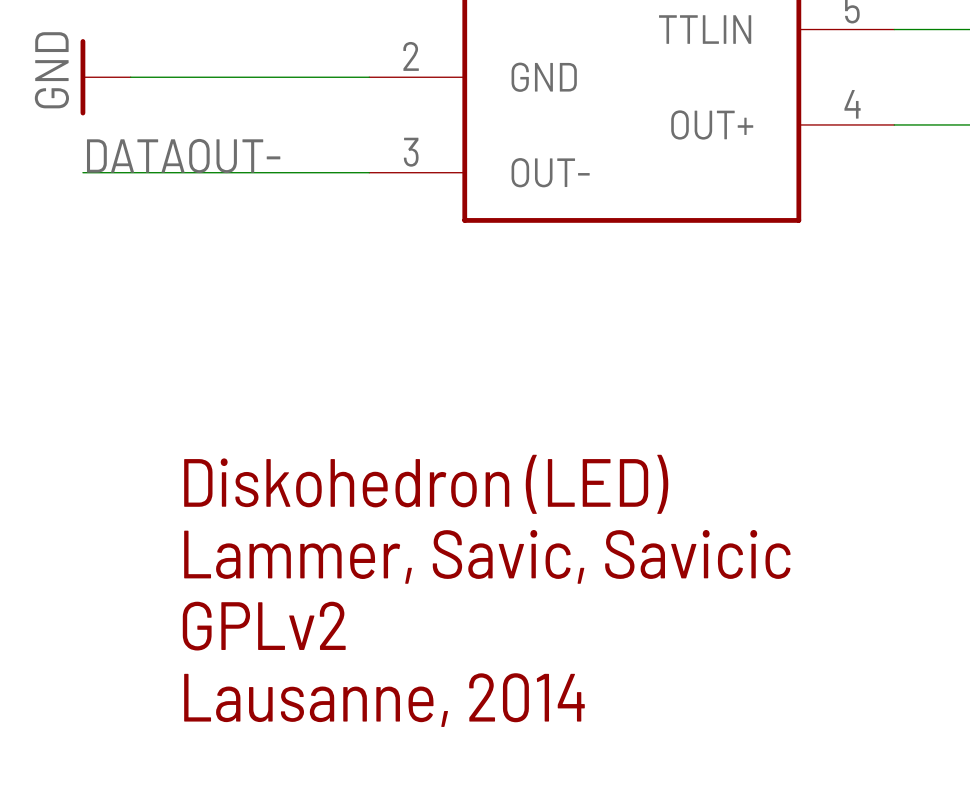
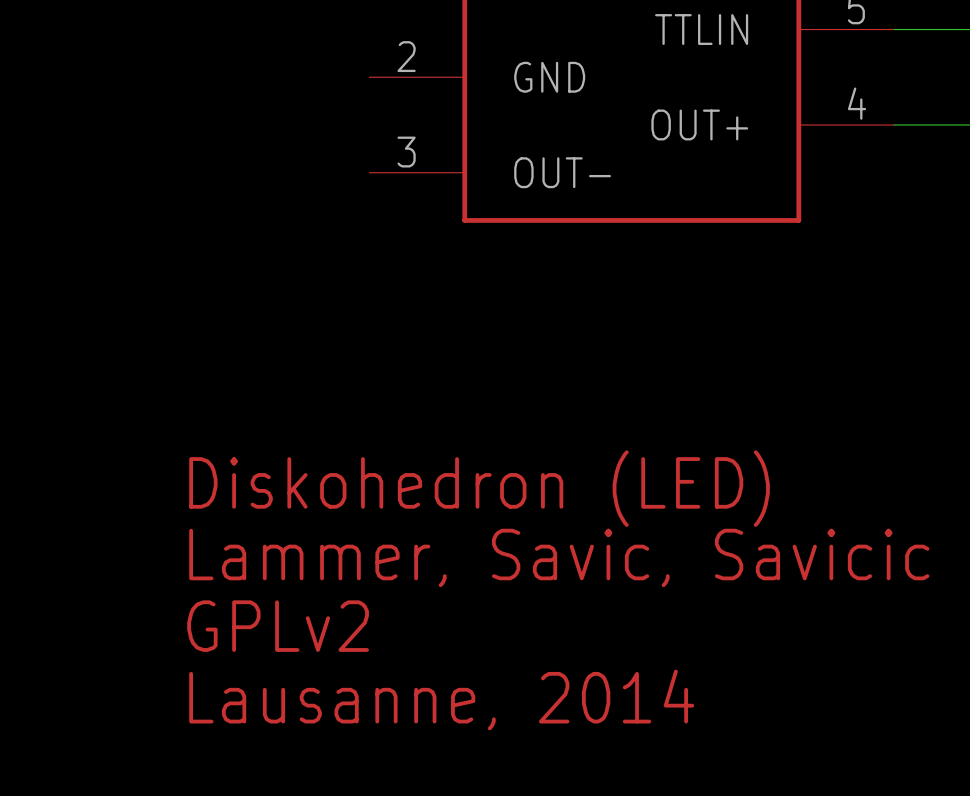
power symbol: GND (105, 77) -> none
wire: (130, 77) (369, 77) -> none
label: DATAOUT- (183, 156) -> none
wire: (82, 172) (369, 172) -> none

